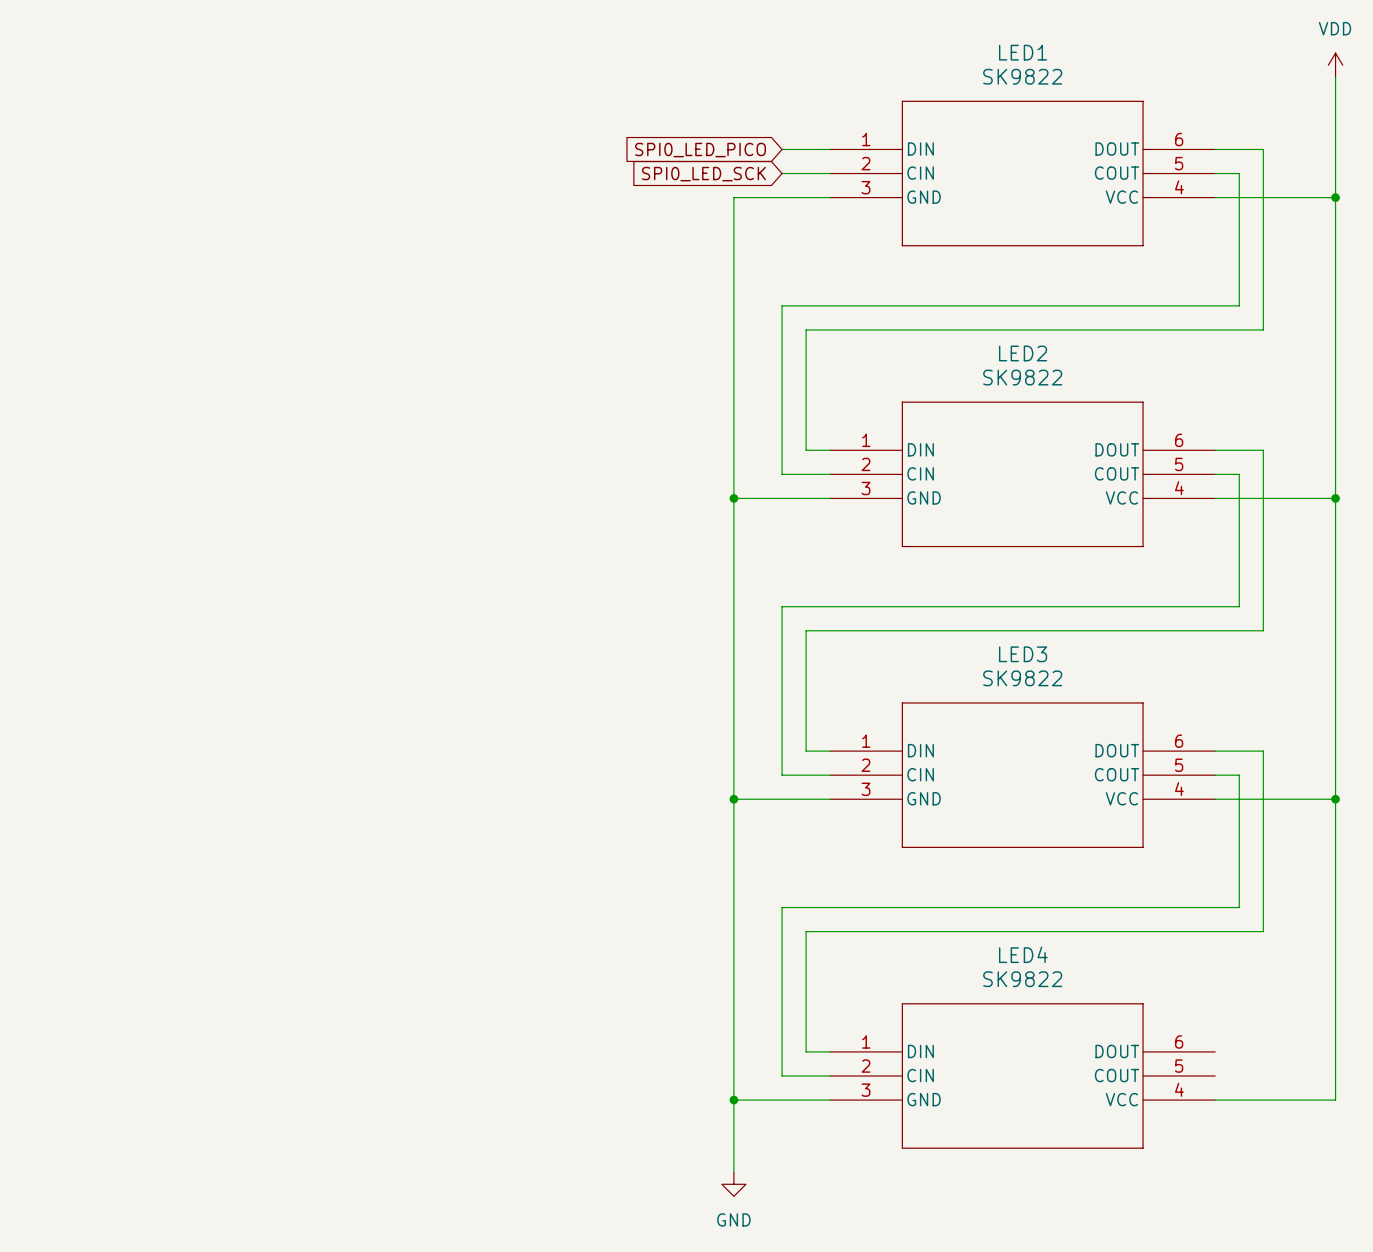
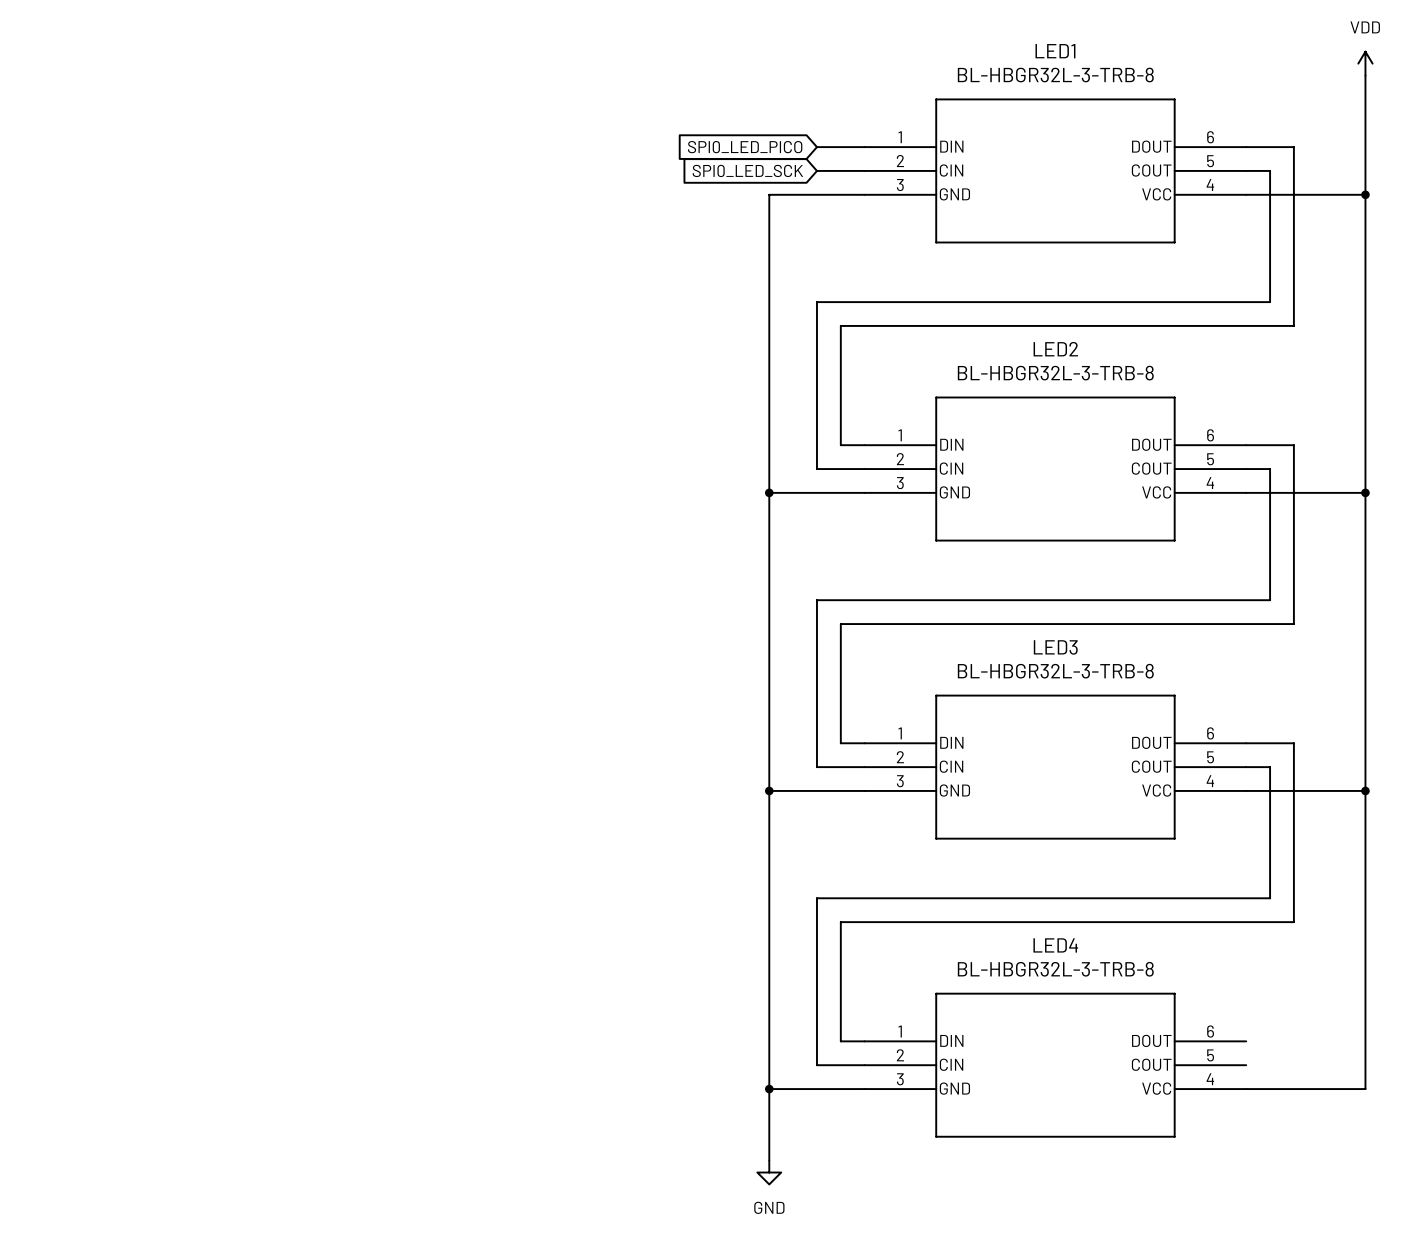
LED1 value: SK9822 (1022, 76) -> BL-HBGR32L-3-TRB-8 (1055, 75)
LED2 value: SK9822 (1022, 377) -> BL-HBGR32L-3-TRB-8 (1055, 373)
LED3 value: SK9822 (1022, 678) -> BL-HBGR32L-3-TRB-8 (1055, 671)
LED4 value: SK9822 (1022, 979) -> BL-HBGR32L-3-TRB-8 (1055, 969)

